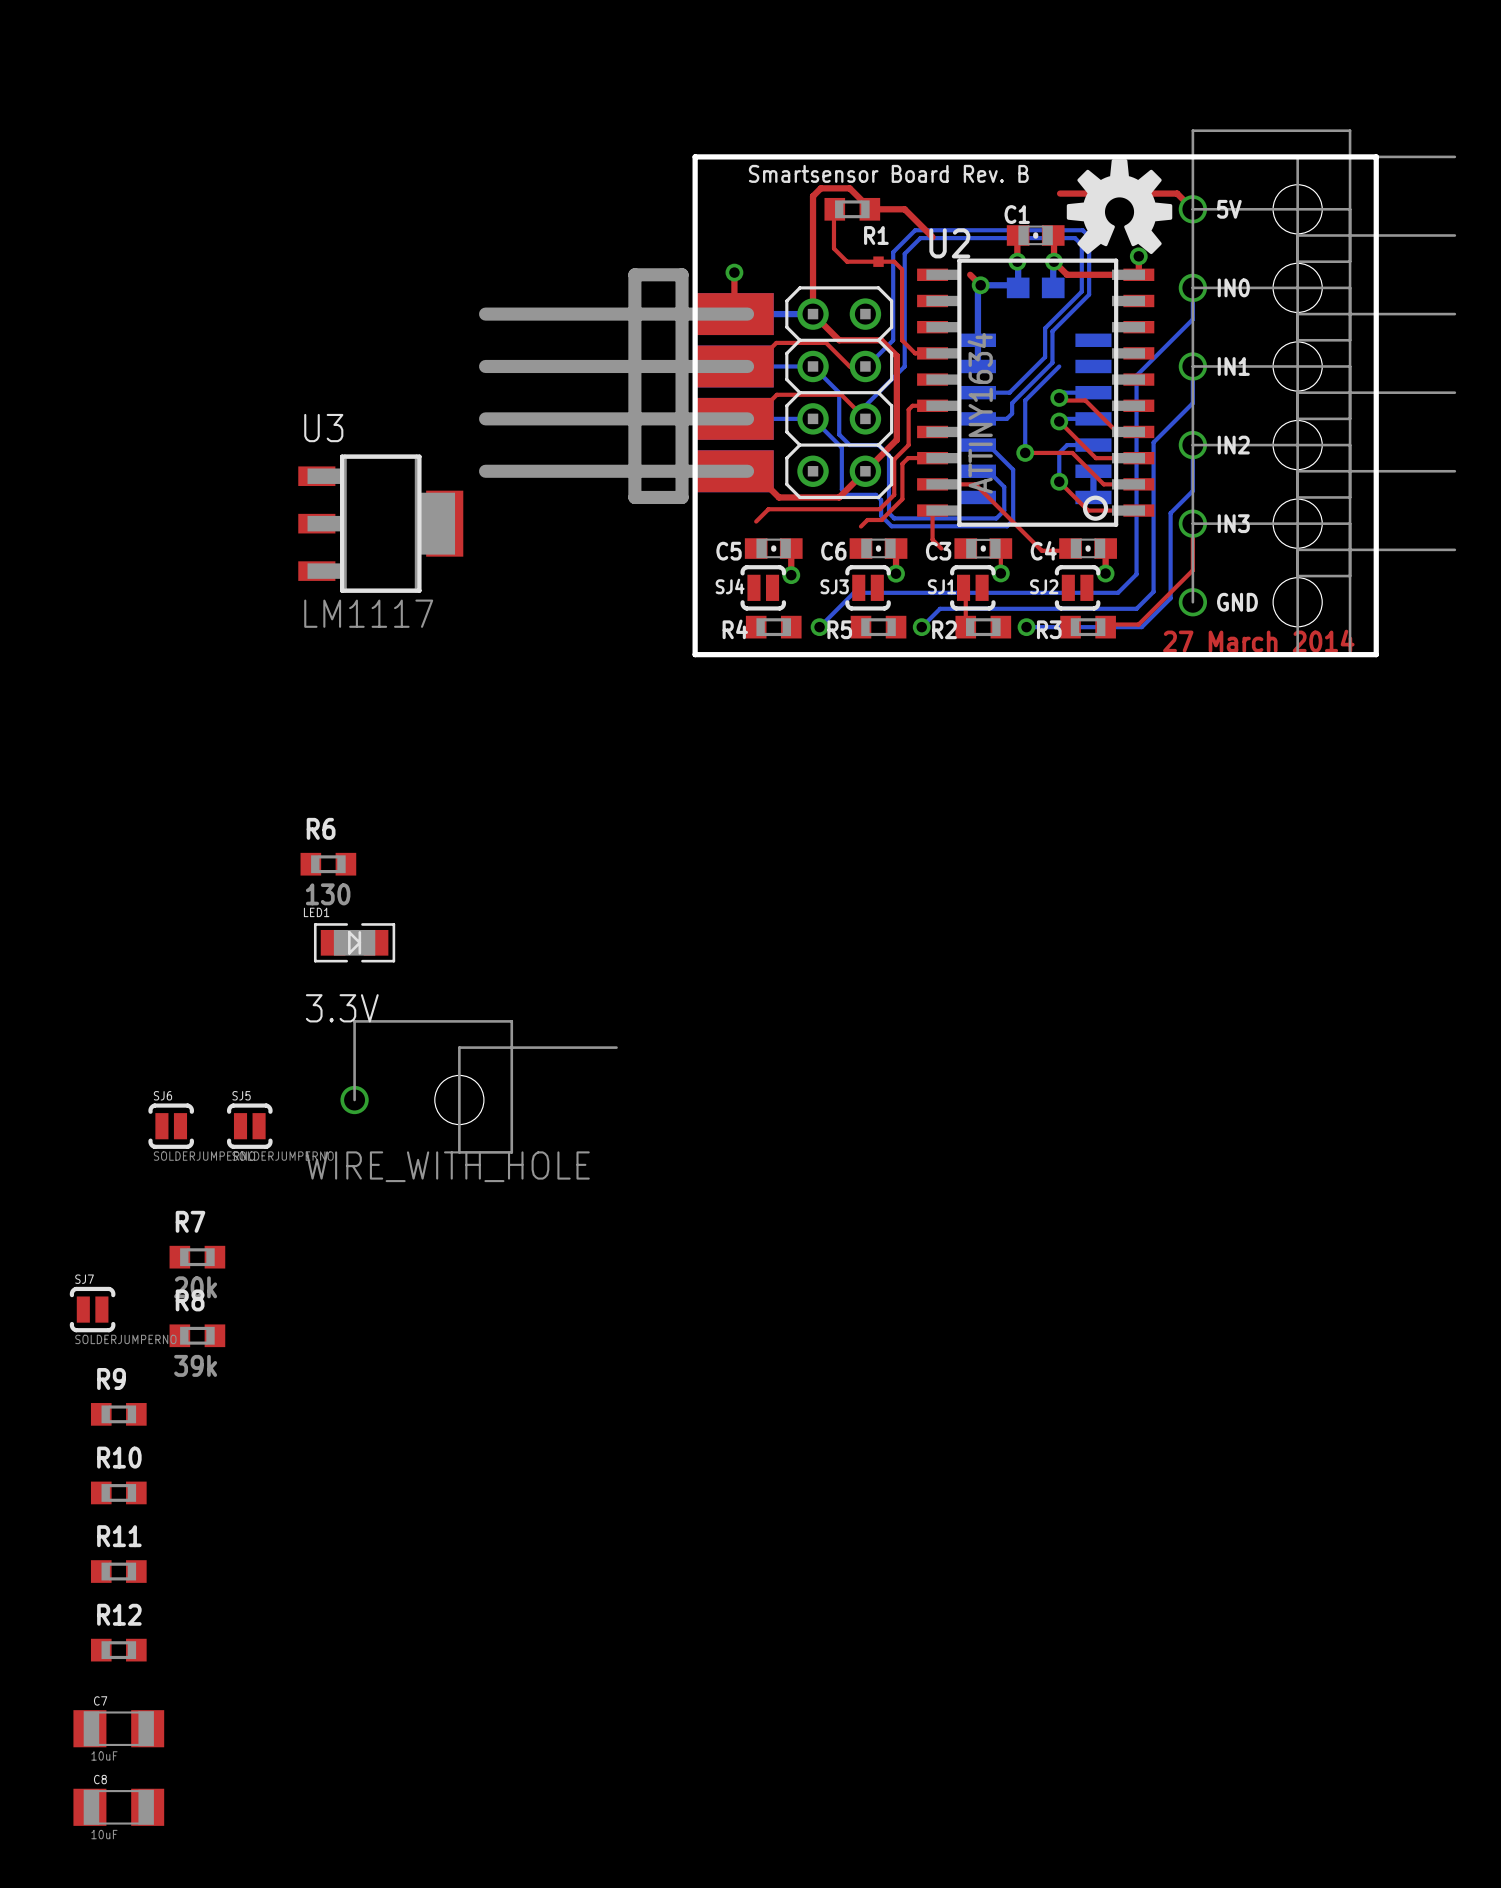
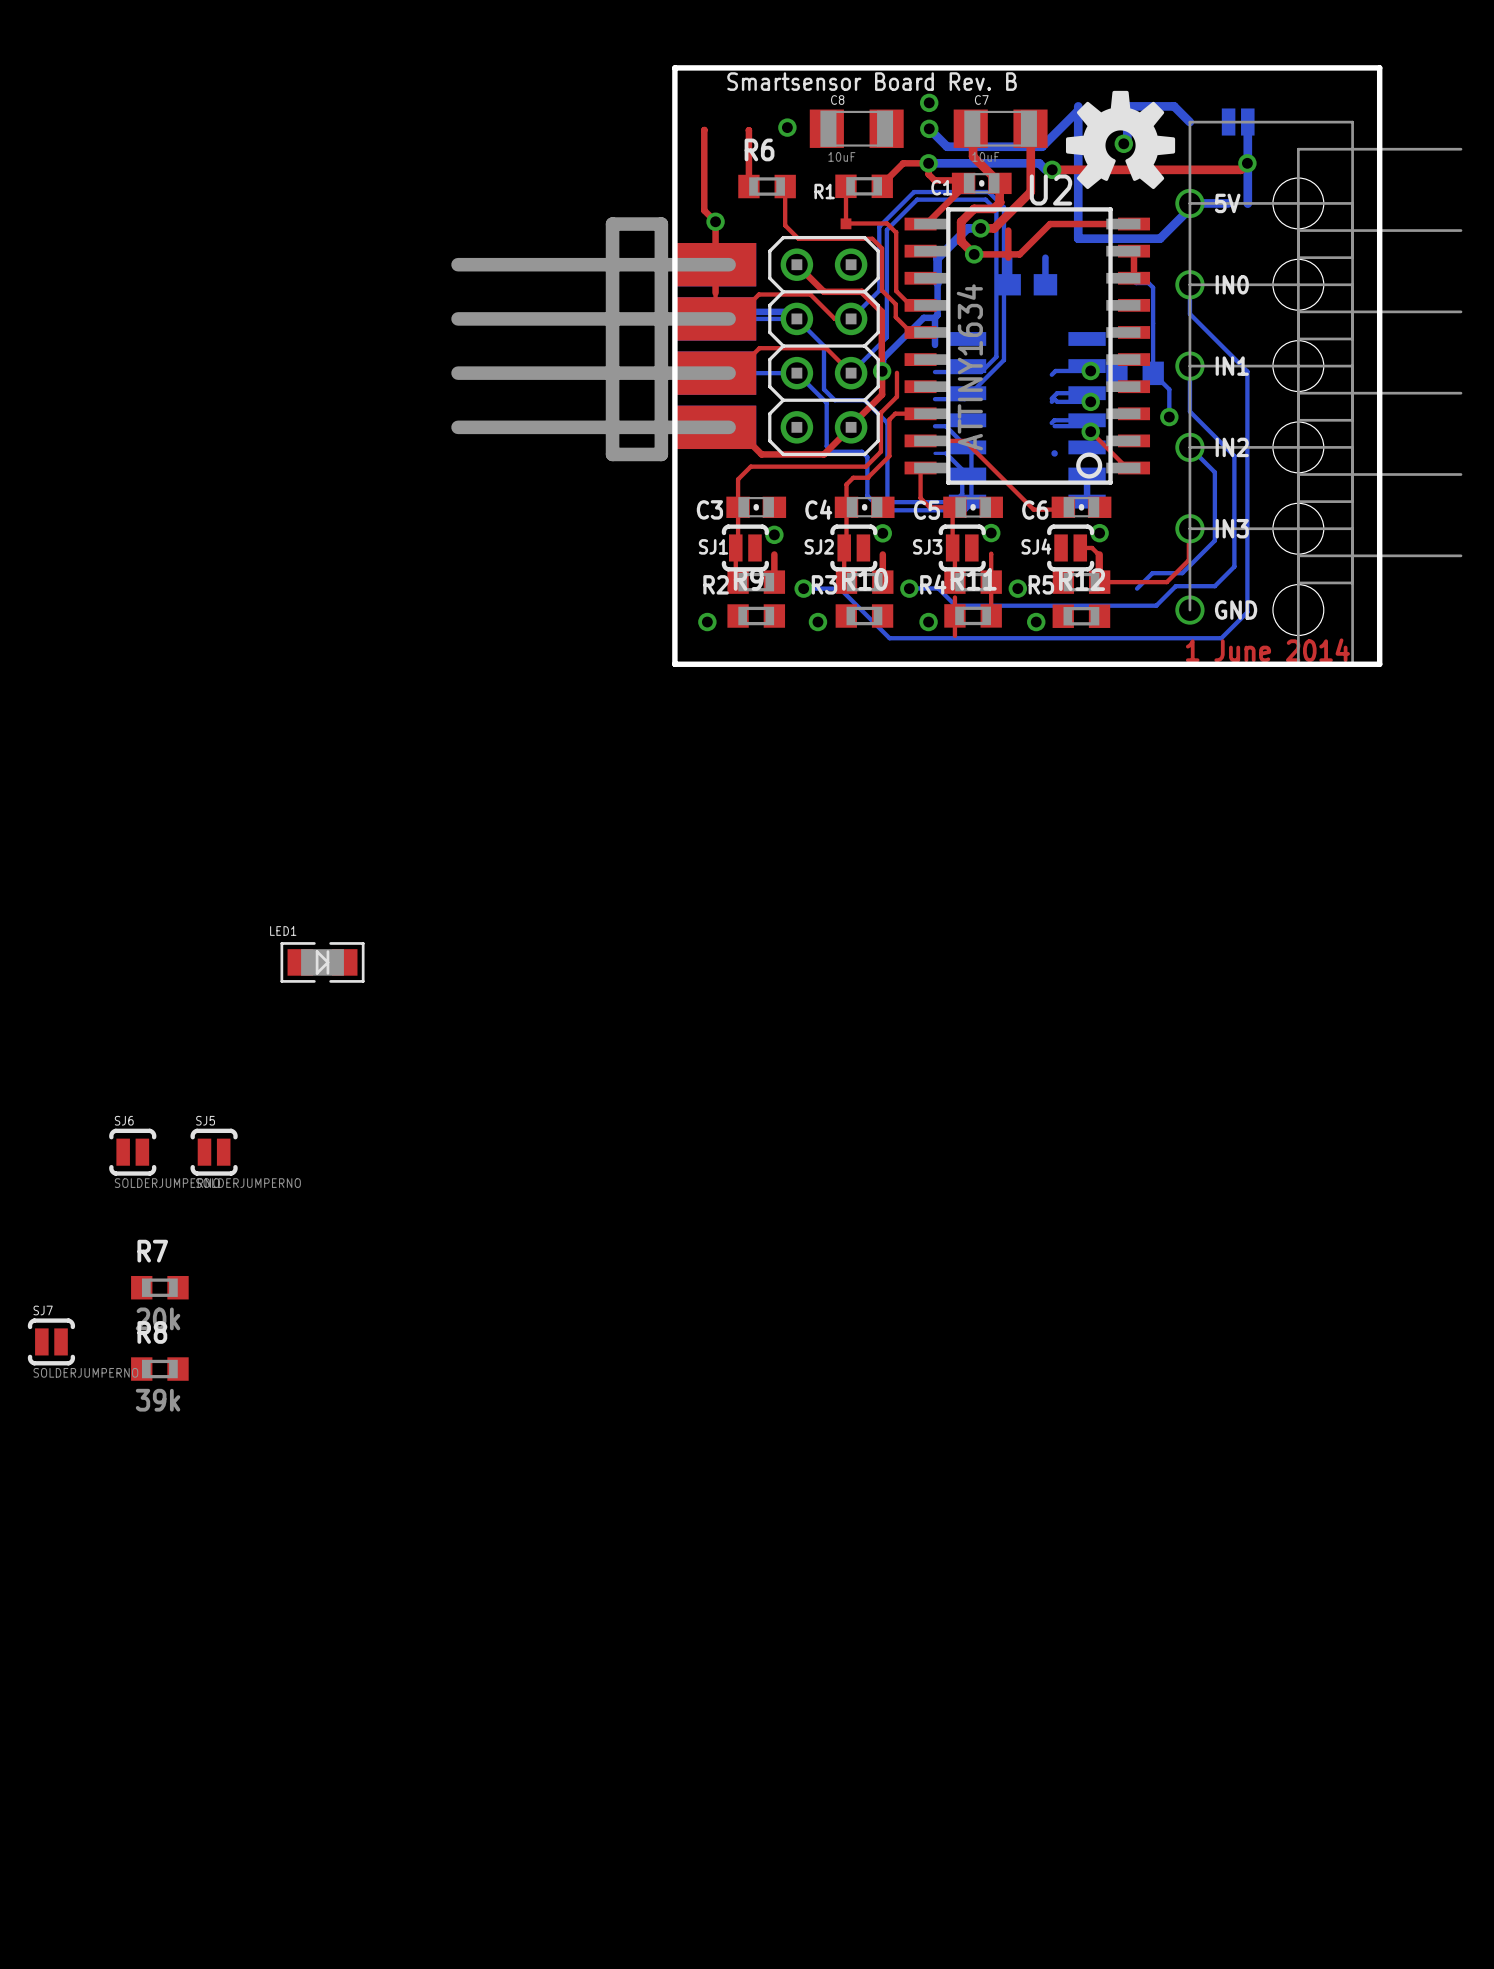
via: none -> (929, 102)
bottom track: none -> (1189, 122) (1174, 106) (1127, 106) (1127, 140) (1123, 143)
part: none -> (1238, 122)
bottom track: none -> (1247, 122) (1247, 203) (1247, 163)
via: none -> (787, 127)
bottom track: none -> (929, 128) (947, 146) (1042, 146) (1078, 110) (1078, 106) (1078, 238) (1160, 238) (1189, 208) (1189, 203) (1228, 203)
via: none -> (929, 128)
top track: none -> (970, 128) (973, 128) (973, 156) (999, 183)
top track: none -> (1030, 128) (1030, 191) (994, 228) (980, 228)
top track: none -> (704, 130) (704, 210) (715, 221) (715, 264)
top track: none -> (748, 130) (748, 186)
via: none -> (1123, 143)
board edge: (695, 156) (1376, 156) -> (674, 149) (674, 67) (1379, 67) (1379, 149)
bottom track: none -> (928, 163) (1039, 163) (1045, 169) (1052, 169)
via: none -> (928, 163)
top track: none -> (1247, 163) (1240, 169) (1052, 169)
via: none -> (1247, 163)
text position: Smartsensor Board Rev. B (888, 173) -> Smartsensor Board Rev. B (872, 81)
via: none -> (1052, 169)
top track: none -> (999, 183) (1000, 202) (993, 208) (974, 208) (961, 221) (961, 241) (974, 254) (1019, 254) (1050, 224) (1134, 224)
top track: none -> (785, 186) (785, 225) (798, 238) (872, 238) (882, 248) (882, 290) (895, 304) (895, 317) (911, 332) (920, 332)
top track: none -> (846, 186) (846, 223) (886, 223) (896, 232) (896, 291) (910, 305)
top track: none -> (882, 186) (903, 163) (928, 163) (928, 174) (934, 180) (963, 180) (963, 186) (926, 224) (920, 224)
top track: (1060, 193) (1177, 193) (1192, 209) -> none
drawing position: (1119, 206) -> (1120, 139)
top track: (869, 208) (849, 188) (820, 188) (813, 196) (813, 314) (839, 340) (881, 340) (896, 356) (896, 439) (839, 497) (778, 497) (760, 479) (755, 479) (747, 471) (734, 471) -> none
top track: (834, 209) (833, 248) (847, 261) (894, 261) (902, 269) (902, 340) (915, 353) (932, 353) -> none
R1 position: (852, 209) -> (864, 186)
top track: (869, 209) (904, 209) (932, 237) -> none
C1 name position: C1 (1017, 214) -> C1 (941, 187)
bottom track: none -> (980, 228) (967, 228) (937, 258) (937, 315) (935, 317)
via: none -> (980, 228)
R1 name position: R1 (876, 235) -> R1 (824, 191)
C1 position: (1035, 235) -> (981, 183)
top track: (1053, 235) (1054, 261) (1067, 274) (1138, 274) -> none
U2 name position: U2 (949, 243) -> U2 (1051, 189)
via: (1138, 256) -> none
via: none -> (974, 254)
part position: (878, 261) -> (846, 223)
via: (1017, 261) -> none
via: (1054, 261) -> none
top track: none -> (796, 264) (823, 291) (861, 291) (881, 311) (882, 394) (823, 454) (761, 454) (742, 435) (737, 435) (729, 427) (715, 427)
via position: (734, 272) -> (715, 221)
top track: (970, 274) (980, 285) -> none
via: (980, 285) -> none
bottom track: none -> (1136, 283) (1148, 283) (1153, 287) (1153, 373) (1169, 389) (1169, 417)
bottom track: (1018, 287) (1015, 285) (980, 285) (977, 288) (977, 366) -> none
bottom track: (1192, 316) (1192, 319) (1136, 375) (1136, 574) (1118, 592) (853, 592) (819, 627) -> (1189, 314) (1247, 371) (1247, 612) (1221, 638) (889, 638) (839, 588) (803, 588)
bottom track: none -> (935, 317) (935, 344)
bottom track: none -> (935, 317) (923, 317) (883, 358) (882, 371)
bottom track: none -> (715, 318) (796, 318) (823, 346) (823, 389) (834, 400) (864, 400) (887, 423) (887, 502) (954, 502) (962, 494) (962, 469) (945, 453) (935, 453)
bottom track: none -> (851, 318) (879, 290) (879, 226) (914, 192) (988, 192) (1003, 207) (1003, 360) (964, 399) (935, 399)
top track: (734, 366) (768, 366) (771, 363) (771, 348) (776, 342) (826, 342) (849, 366) (865, 366) -> (715, 318) (750, 318) (753, 316) (753, 299) (758, 294) (810, 294) (834, 318) (851, 318)
bottom track: (734, 366) (813, 366) (839, 392) (839, 434) (849, 445) (878, 445) (888, 455) (888, 513) (894, 518) (996, 518) (1004, 510) (1004, 486) (988, 471) (977, 471) -> none
bottom track: (865, 366) (893, 340) (893, 252) (915, 230) (1082, 230) (1089, 236) (1089, 294) (1052, 331) (1052, 362) (1012, 403) (1012, 413) (1006, 418) (977, 418) -> none
bottom track: (1059, 366) (1025, 400) (1025, 452) -> none
via: none -> (882, 371)
bottom track: none -> (1090, 370) (1055, 370) (1051, 374)
via: none -> (1090, 370)
top track: none -> (896, 372) (896, 396) (880, 412) (880, 451) (866, 466) (750, 466) (738, 479) (738, 545) (735, 547) (735, 579) (738, 582)
bottom track: none -> (935, 372) (981, 372) (996, 356) (996, 210) (985, 199) (917, 199) (886, 229) (886, 337) (851, 373)
bottom track: none -> (715, 373) (796, 373) (826, 402) (826, 446) (832, 451) (861, 451) (867, 457) (867, 495) (881, 510) (965, 510) (971, 504) (971, 451) (945, 426) (935, 426)
part: none -> (1135, 373)
part position: (626, 379) -> (603, 332)
part position: (839, 392) -> (823, 346)
bottom track: (977, 392) (1009, 392) (1045, 357) (1045, 328) (1081, 291) (1081, 244) (1075, 238) (920, 238) (904, 253) (904, 366) (865, 405) (865, 418) -> none
U2 position: (1035, 392) -> (1027, 346)
top track: (1059, 397) (1061, 400) (1085, 400) (1116, 431) (1138, 431) -> none
via: (1059, 397) -> none
bottom track: none -> (1051, 401) (1054, 399) (1057, 401) (1090, 401)
via: none -> (1090, 401)
bottom track: (1192, 403) (1153, 442) (1153, 591) (1136, 608) (940, 608) (921, 627) -> (1189, 404) (1189, 411) (1234, 456) (1234, 566) (1214, 586) (1175, 586) (1156, 605) (954, 605) (938, 588) (909, 588)
top track: (932, 405) (912, 405) (908, 409) (908, 445) (894, 459) (894, 494) (879, 509) (768, 509) (756, 521) -> none
top track: none -> (920, 413) (895, 413) (889, 419) (889, 456) (868, 477) (853, 477) (846, 484) (846, 545) (844, 547) (844, 579) (846, 582)
via: none -> (1169, 417)
top track: (734, 418) (744, 408) (763, 408) (776, 394) (841, 394) (865, 418) -> (715, 373) (726, 362) (745, 362) (759, 348) (826, 348) (851, 373)
bottom track: (734, 418) (813, 418) (841, 447) (841, 489) (847, 494) (875, 494) (881, 500) (881, 515) (891, 526) (1007, 526) (1013, 520) (1013, 469) (988, 445) (977, 445) -> none
top track: (1059, 421) (1095, 458) (1138, 458) -> none
via: (1059, 421) -> none
bottom track: none -> (1054, 426) (1085, 426) (1090, 431)
top track: none -> (1090, 431) (1127, 468) (1134, 468)
via: none -> (1090, 431)
top track: none -> (920, 440) (964, 440) (1033, 509) (1061, 509) (1063, 507)
bottom track: (1093, 445) (1067, 445) (1059, 452) (1059, 481) -> none
bottom track: (1192, 445) (1192, 490) (1170, 513) (1170, 598) (1141, 627) (1026, 627) -> (1189, 447) (1214, 472) (1214, 540) (1182, 573) (1152, 573) (1137, 588)
top track: (1025, 452) (1072, 452) (1103, 484) (1138, 484) -> none
via: (1025, 452) -> none
top track: (932, 458) (908, 458) (902, 463) (902, 499) (881, 519) (867, 519) (860, 526) -> none
top track: none -> (920, 468) (920, 498) (929, 507) (954, 507) (952, 509) (954, 582)
top track: (1059, 481) (1088, 510) (1138, 510) -> none
via: (1059, 481) -> none
top track: (932, 484) (975, 484) (1041, 550) (1068, 550) -> none
top track: (932, 510) (932, 539) (941, 548) -> none
U3: LM1117 (380, 523) -> none
top track: (1192, 523) (1192, 570) (1138, 624) (1108, 624) (1109, 623) -> (1189, 528) (1188, 560) (1166, 582) (1099, 582) (1097, 580) (1097, 553) (1092, 547) (1080, 547)
via: none -> (991, 533)
via: none -> (1099, 533)
via: none -> (882, 533)
via: none -> (774, 534)
C5 position: (773, 548) -> (973, 507)
C6 position: (878, 548) -> (1081, 507)
C3 position: (983, 548) -> (756, 507)
C4 position: (1088, 548) -> (864, 507)
via: (896, 573) -> none
via: (1000, 573) -> none
via: (1105, 573) -> none
via: (791, 575) -> none
via: none -> (803, 588)
via: none -> (909, 588)
via: none -> (1017, 588)
SJ4 position: (763, 587) -> (1070, 547)
SJ3 position: (868, 587) -> (962, 547)
SJ1 position: (972, 587) -> (745, 547)
SJ2 position: (1077, 587) -> (853, 547)
via: none -> (707, 622)
via: none -> (928, 622)
R4 position: (773, 627) -> (973, 582)
via position: (819, 627) -> (817, 622)
R5 position: (878, 627) -> (1081, 582)
via: (921, 627) -> none
R2 position: (983, 627) -> (756, 582)
via position: (1026, 627) -> (1036, 622)
R3 position: (1088, 627) -> (864, 582)
text: 27 March 2014 (1258, 641) -> none
text: none -> 1 June 2014 (1267, 650)
R6 position: (328, 864) -> (767, 186)
R6 value: 130 (328, 894) -> none
3.3V: WIRE_WITH_HOLE (479, 1086) -> none
R9 position: (118, 1414) -> (756, 616)
R10 position: (118, 1492) -> (864, 616)
R11 position: (118, 1571) -> (973, 615)
R12 position: (118, 1650) -> (1081, 616)
C7 position: (118, 1728) -> (1000, 128)
C8 position: (118, 1807) -> (856, 128)

